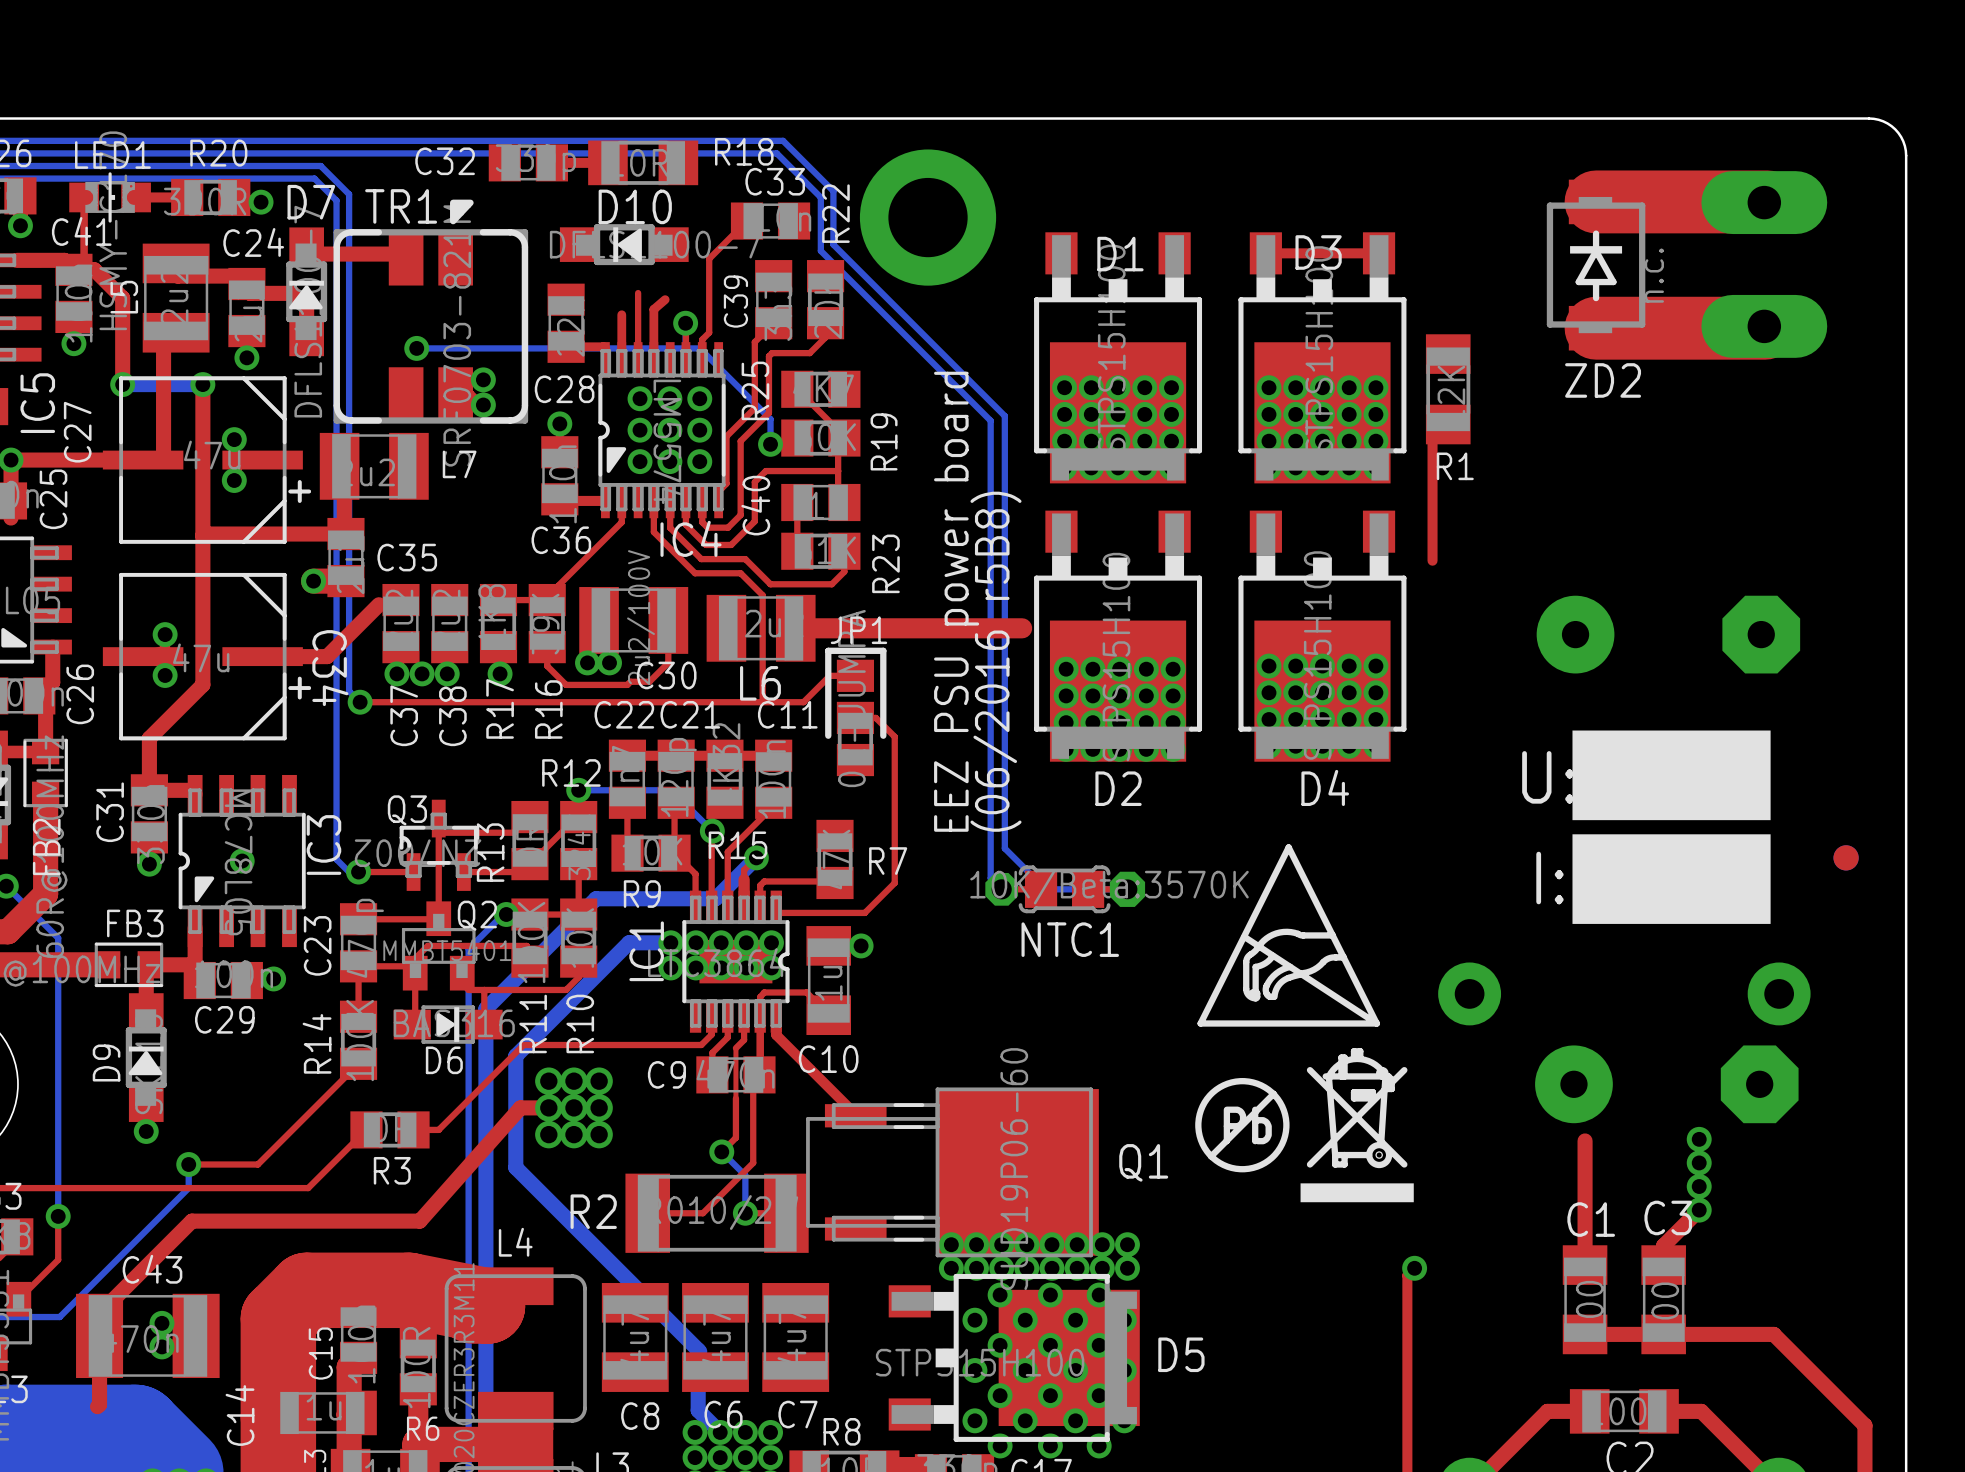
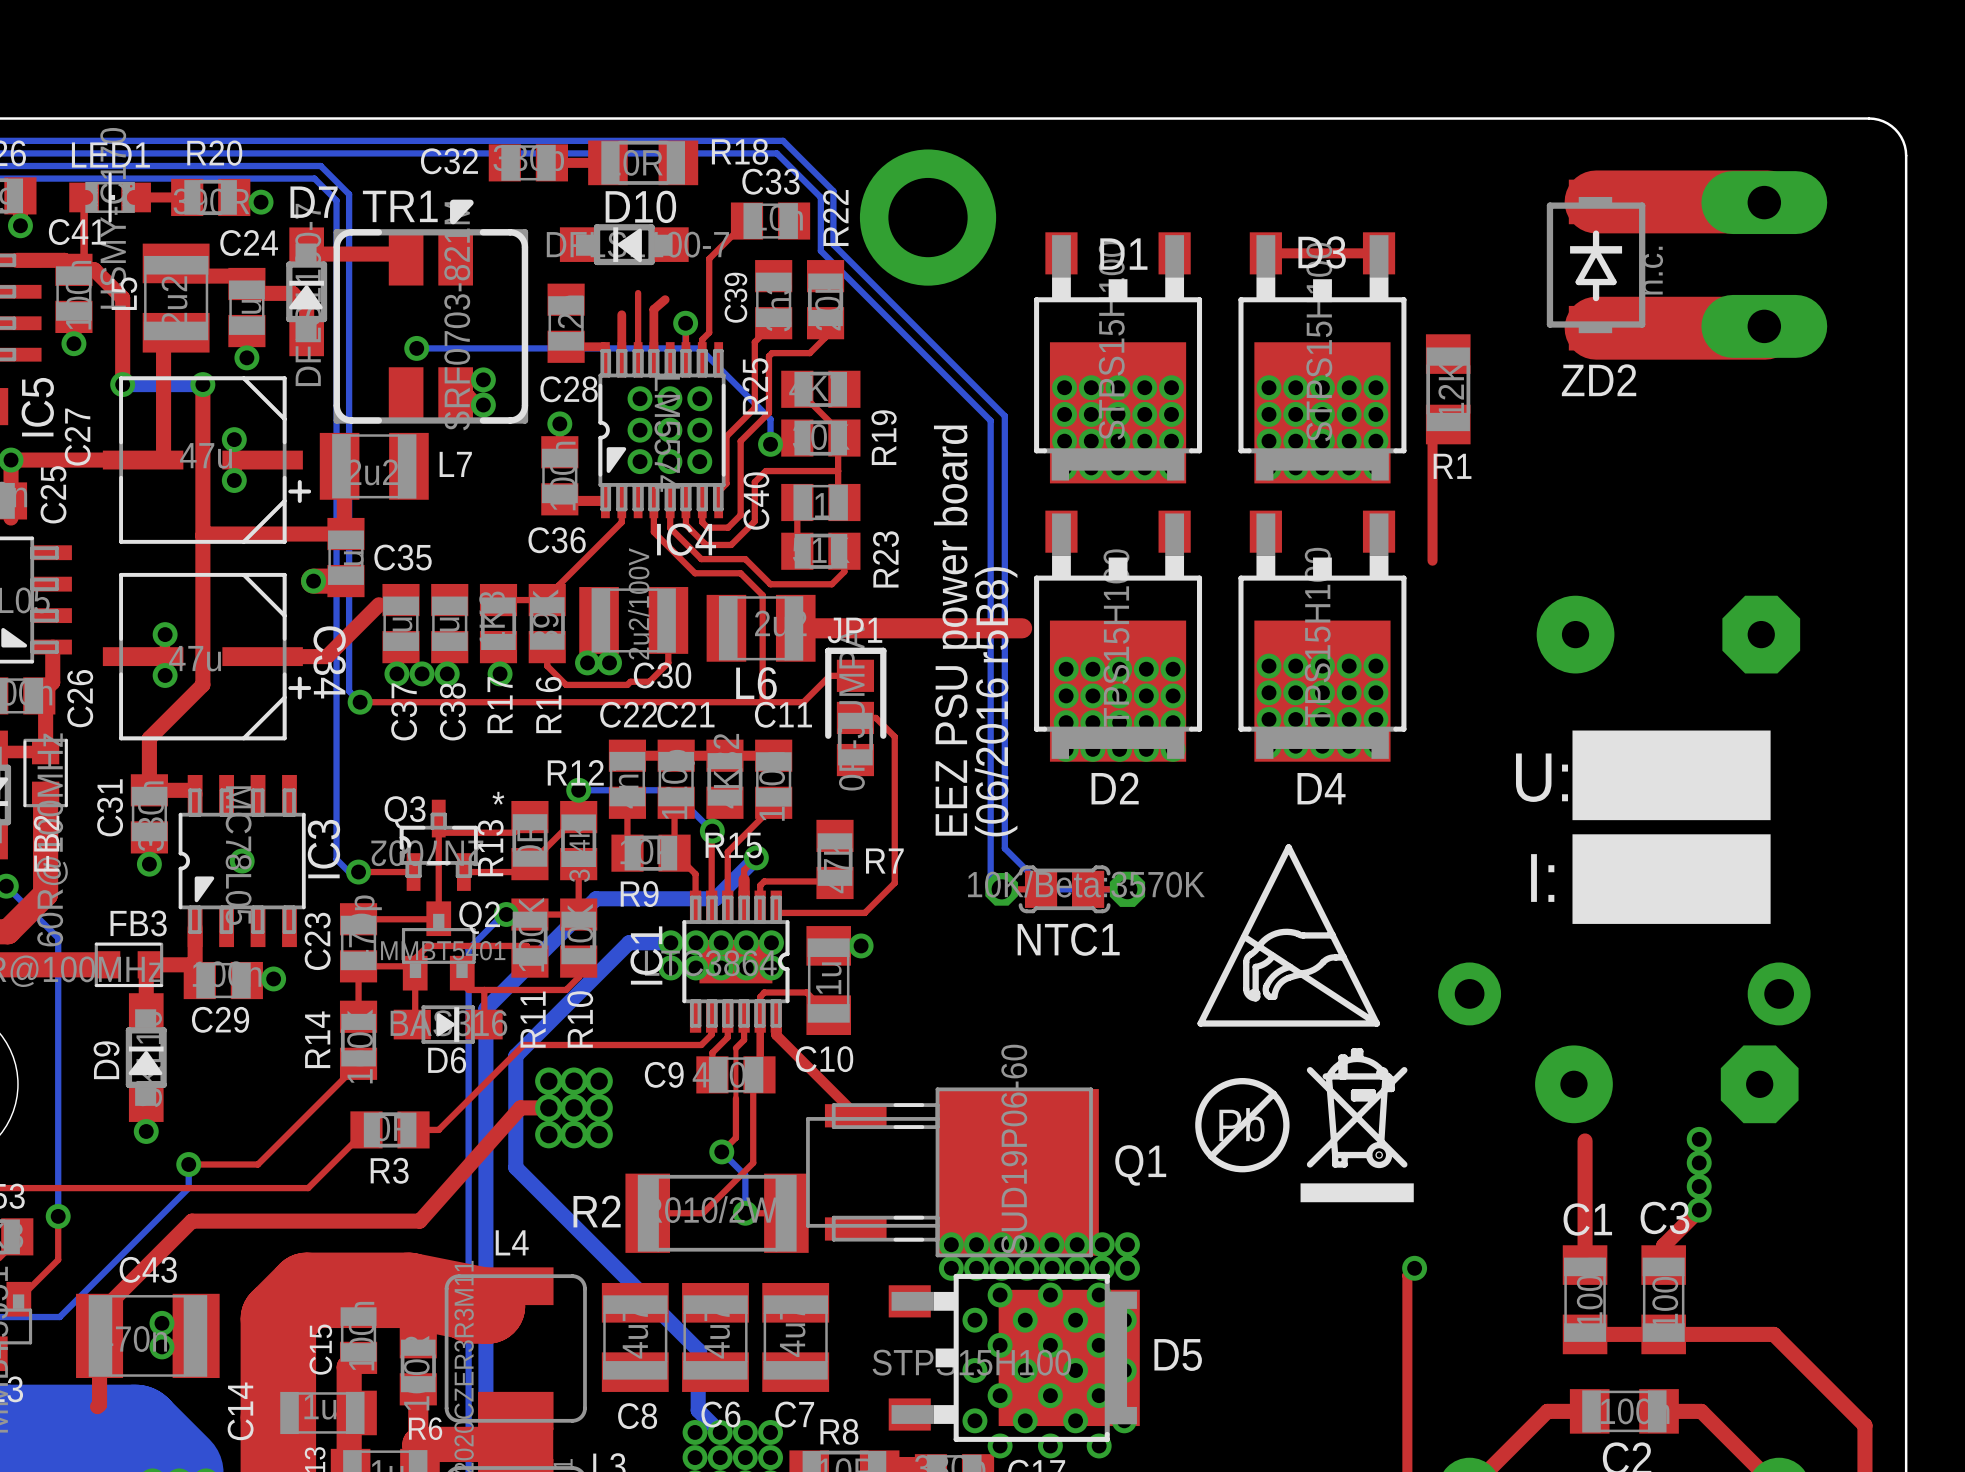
text: none -> * (498, 798)
part: (1846, 857) -> none

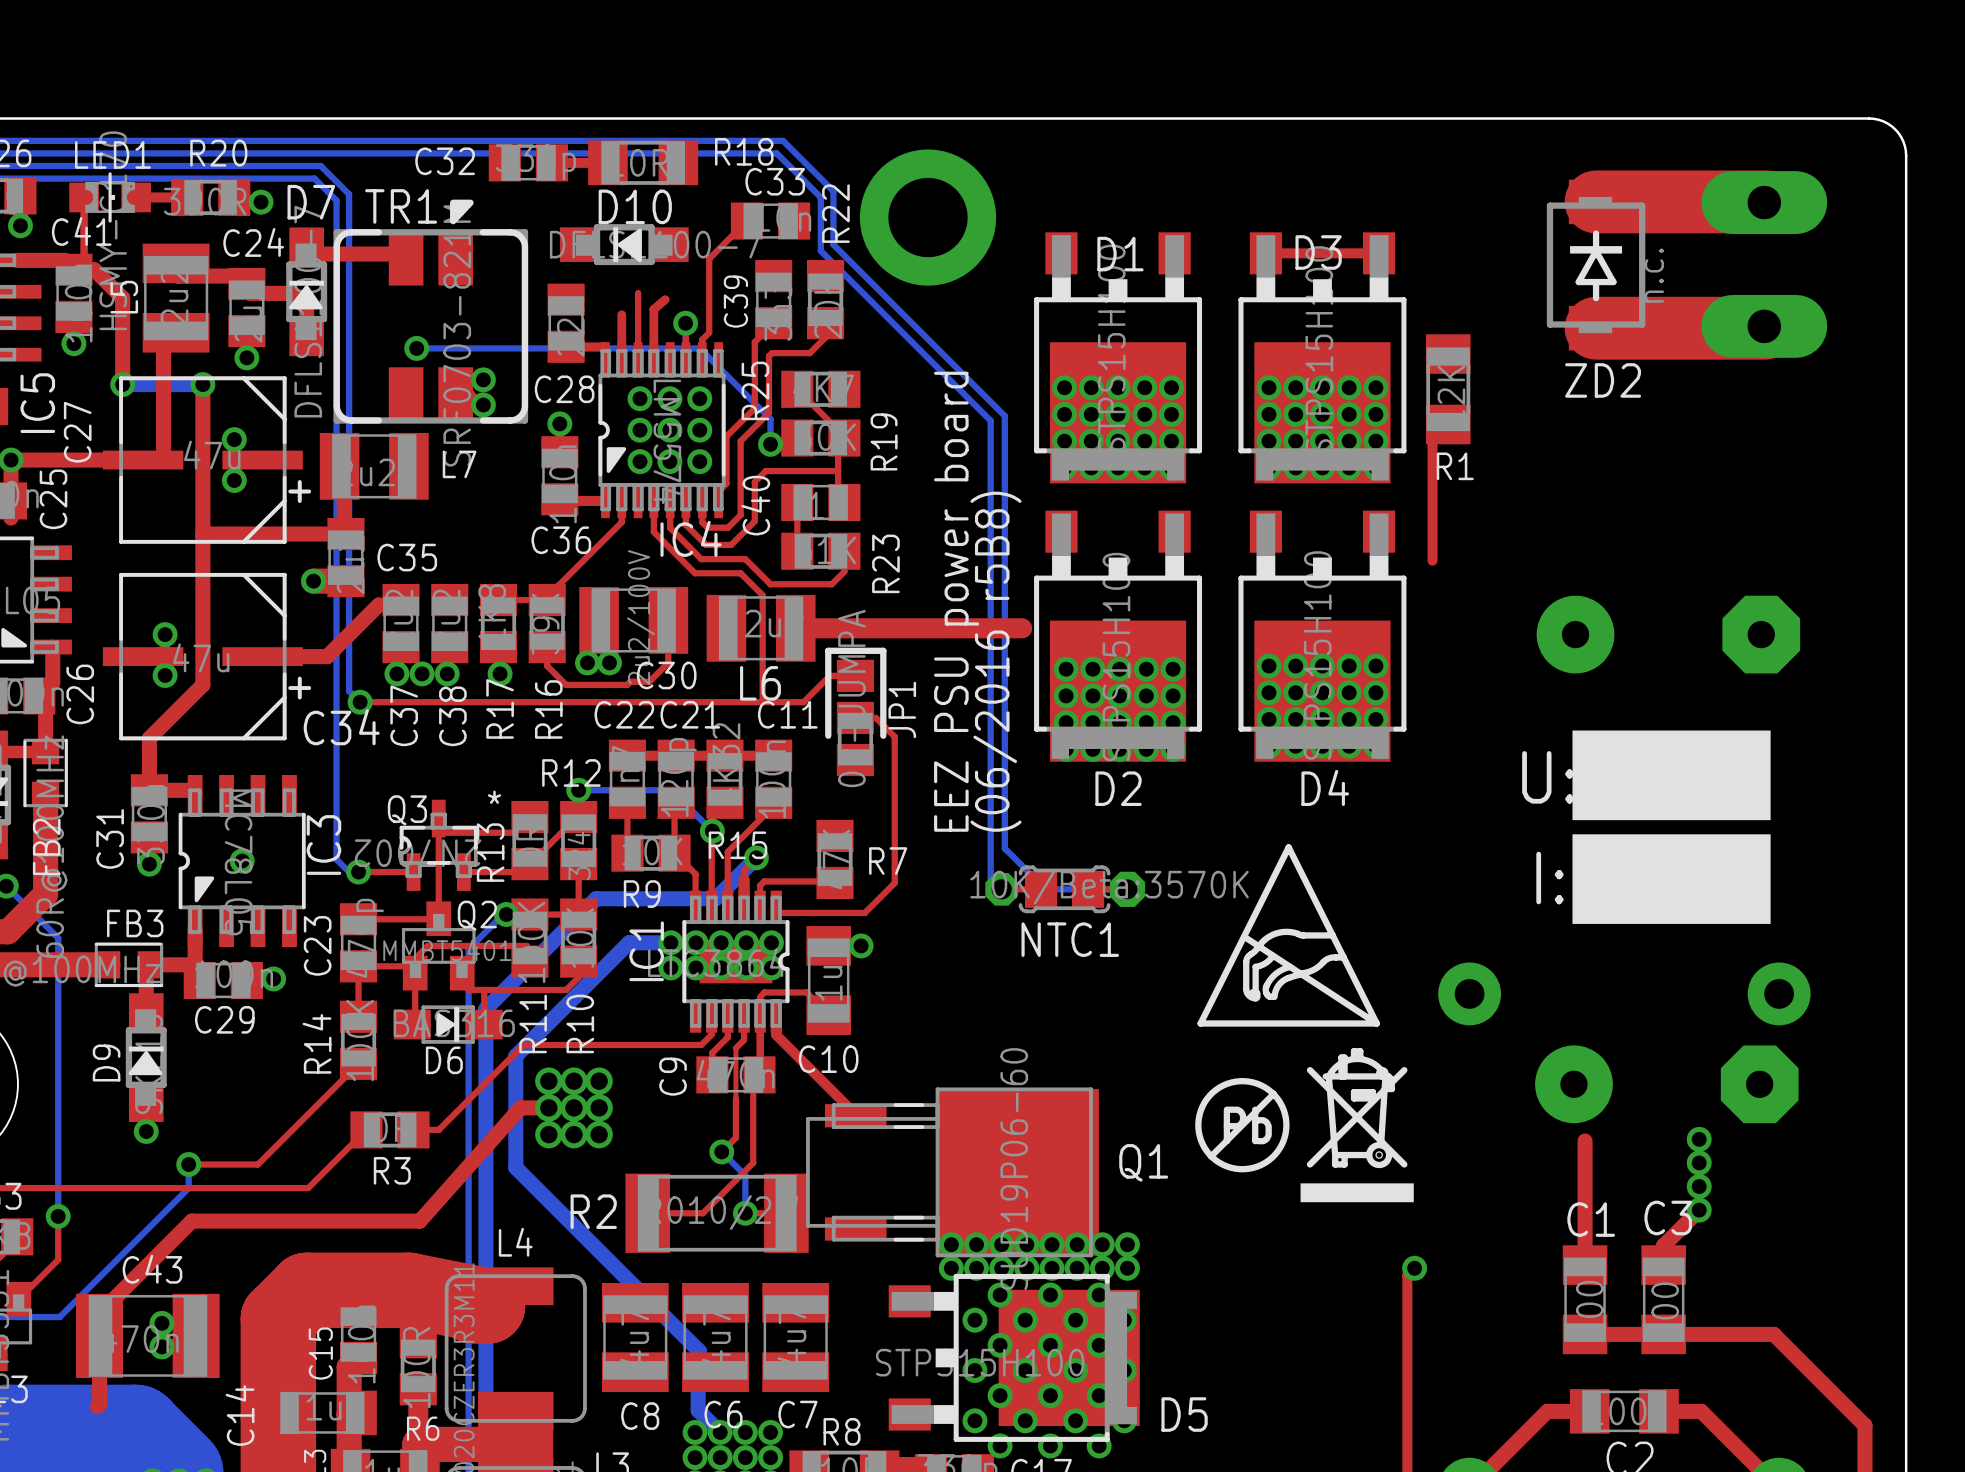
JP1 name rotation: 0° (854, 630) -> 90° counterclockwise (902, 709)
JP1 name position: JP1 (854, 630) -> JP1 (902, 709)
C34 name rotation: 0° (329, 662) -> 90° counterclockwise (341, 727)
C31 name position: C31 (110, 807) -> C31 (110, 838)
C9 name rotation: 0° (664, 1074) -> 90° counterclockwise (673, 1076)
D5 name position: D5 (1178, 1355) -> D5 (1184, 1414)

